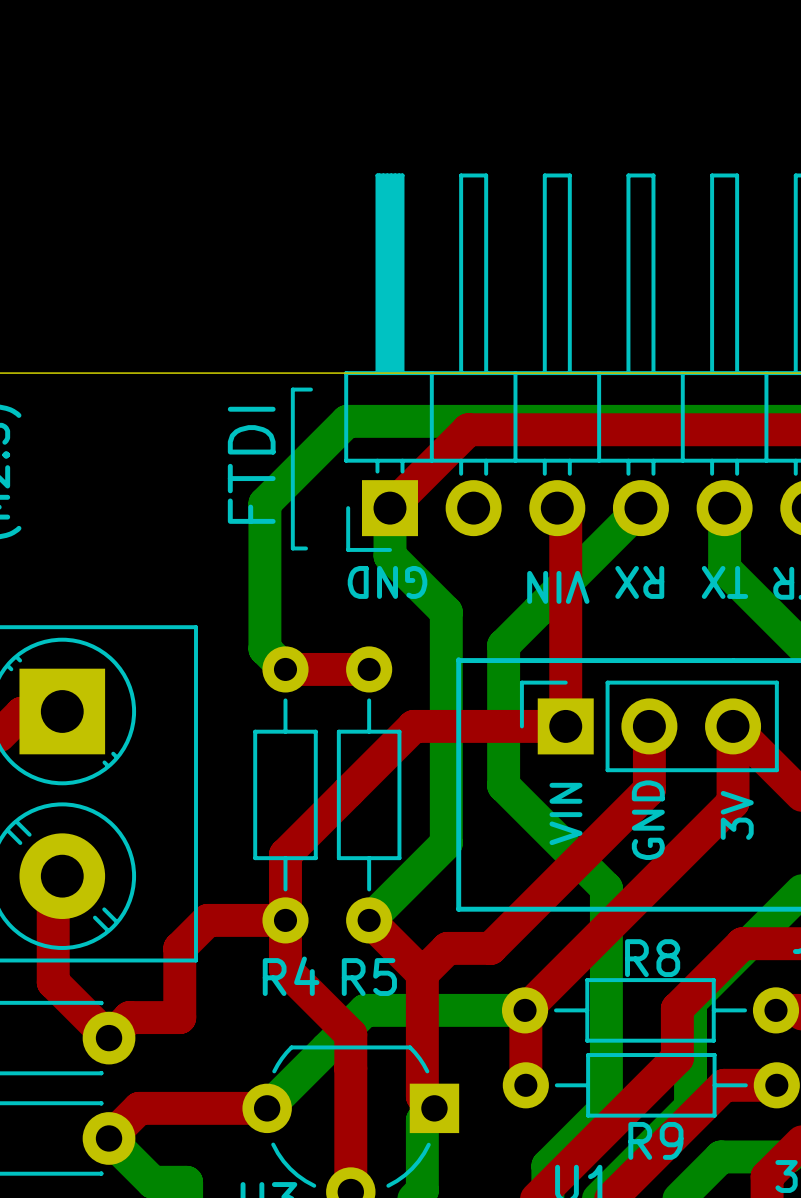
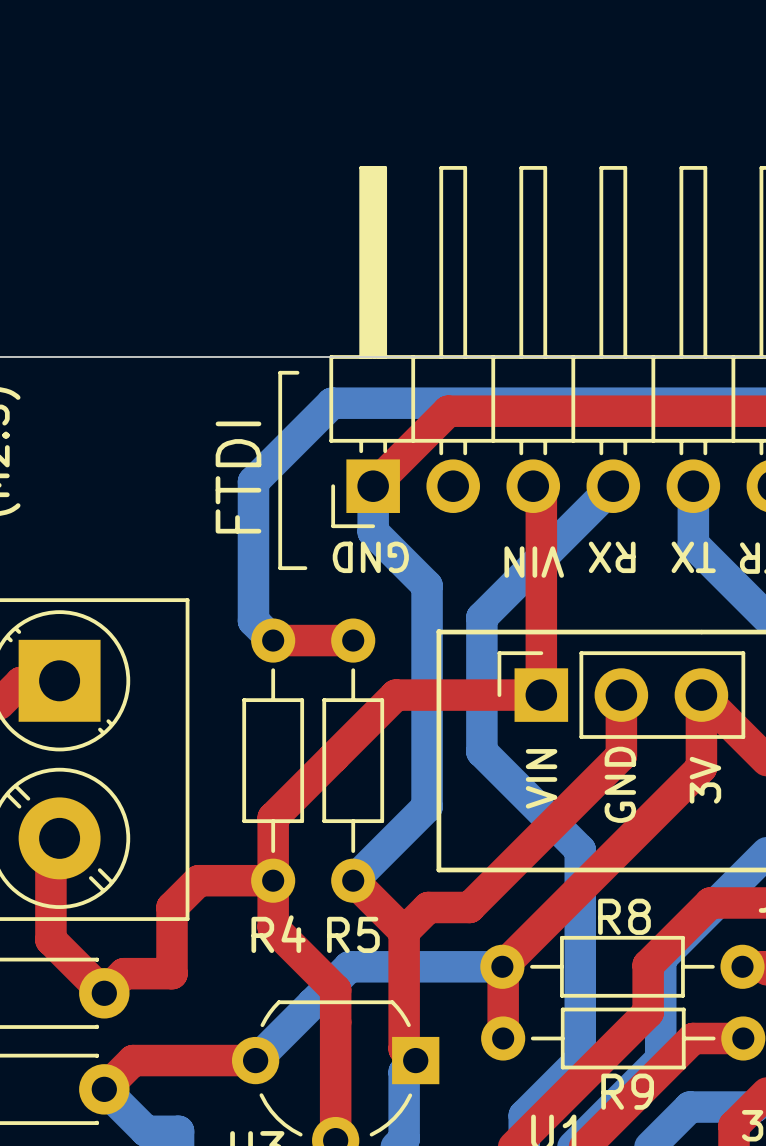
FTDI name position: FTDI (251, 465) -> FTDI (238, 477)
line: (292, 548) (306, 548) -> (280, 524) (280, 568) (305, 568)

